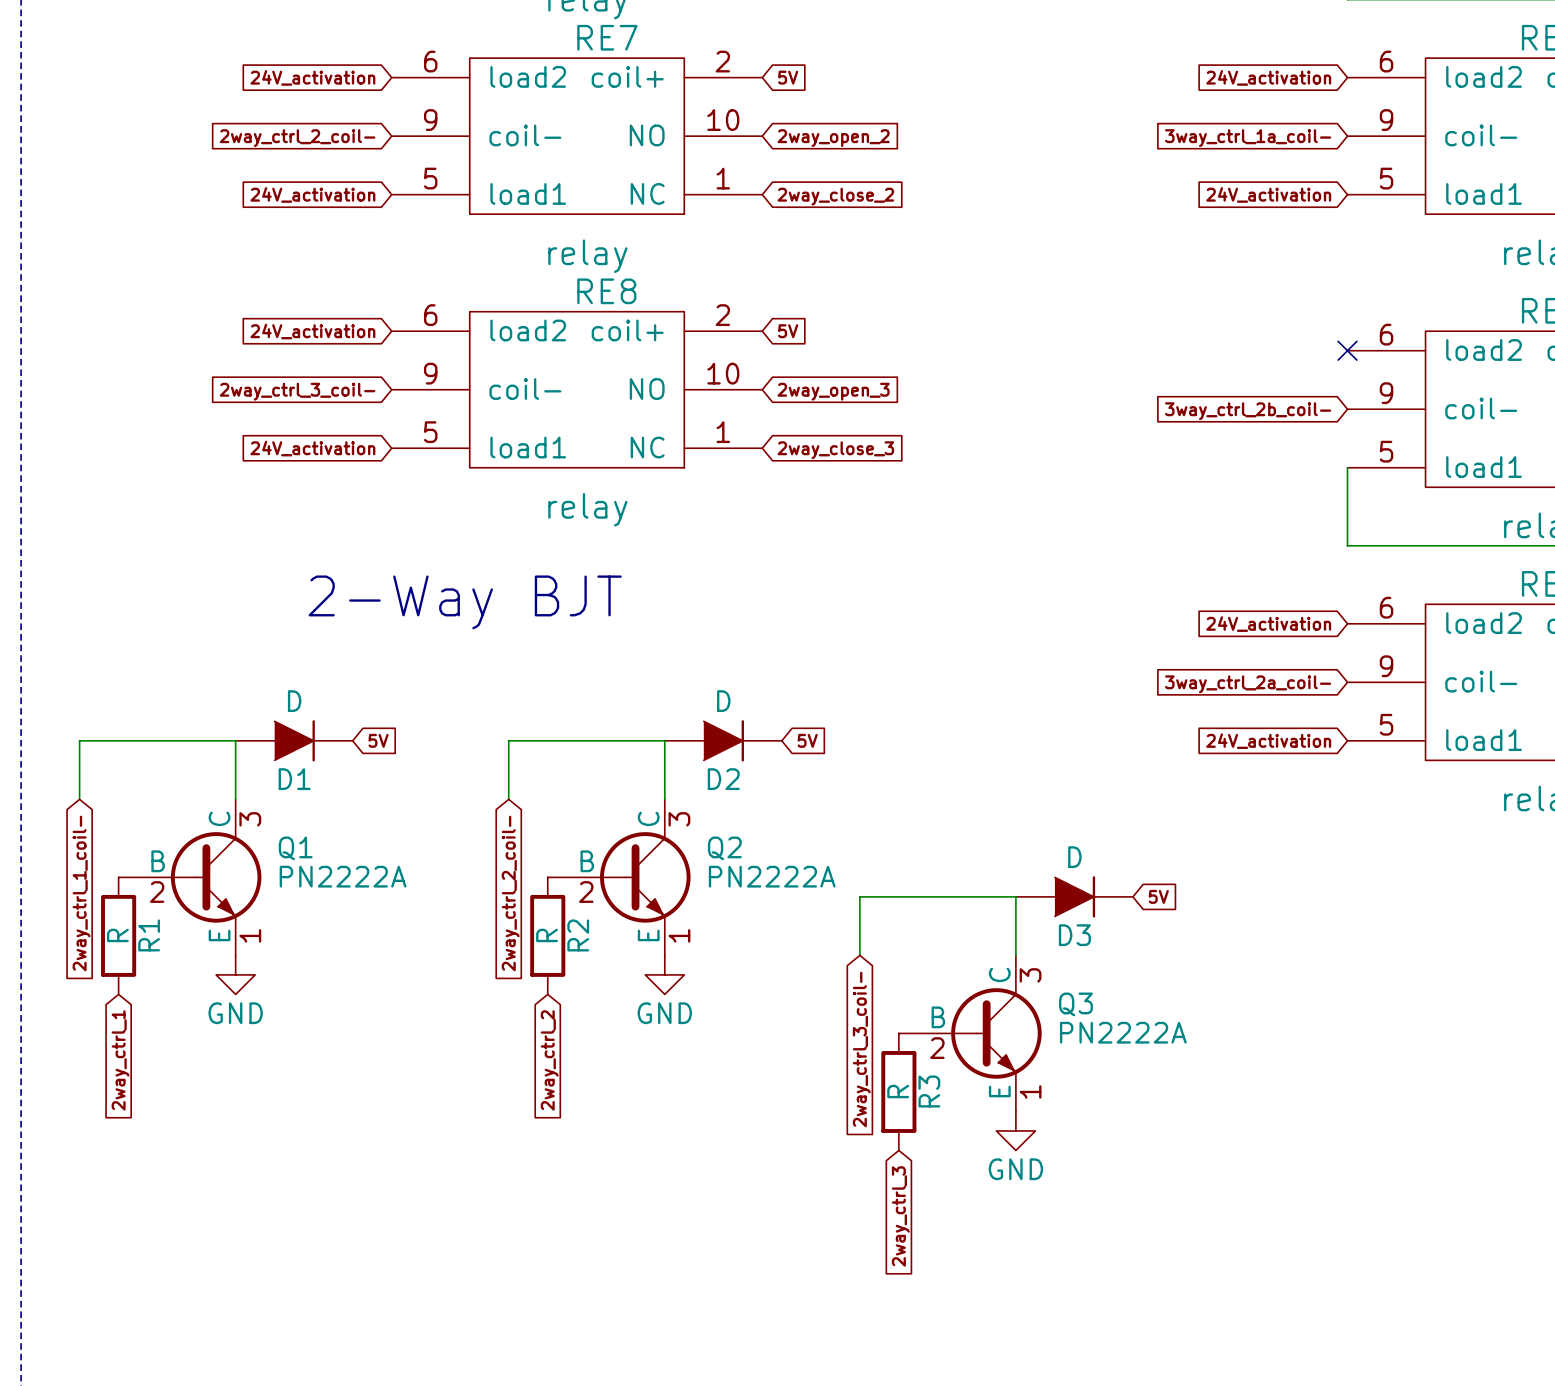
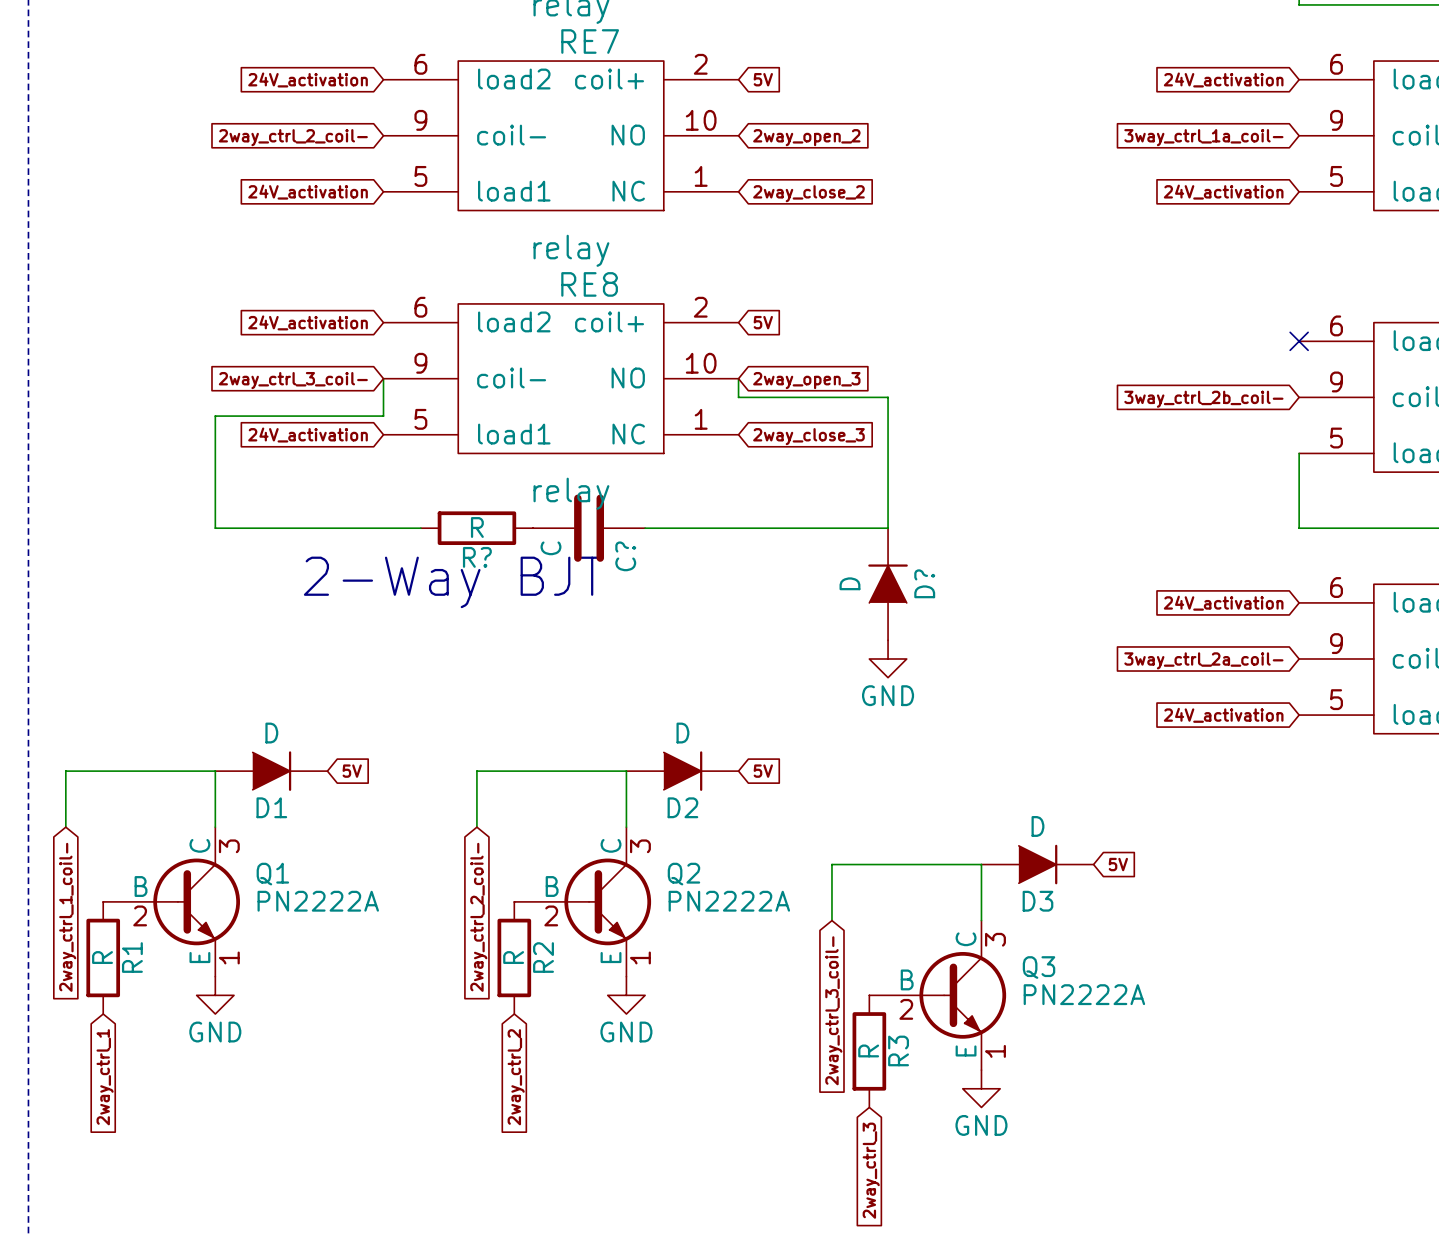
wire: none -> (383, 378) (383, 416) (215, 416) (215, 528) (420, 528)
wire: none -> (738, 378) (738, 397) (888, 397) (888, 528) (645, 528)
R?: none -> R (476, 528)
C?: none -> C (589, 528)
D?: none -> D (888, 584)
power symbol: none -> GND (888, 658)
D1 position: (294, 740) -> (271, 771)
global label position: 5V (378, 740) -> 5V (352, 771)
D2 position: (723, 740) -> (682, 771)
global label position: 5V (807, 740) -> 5V (763, 771)
wire: (79, 799) (79, 740) (235, 740) (235, 799) -> (65, 827) (65, 771) (215, 771) (215, 827)
wire: (508, 799) (508, 740) (664, 740) (664, 799) -> (476, 827) (476, 771) (626, 771) (626, 827)
Q1 position: (190, 877) -> (171, 901)
Q2 position: (619, 877) -> (582, 901)
global label position: 2way_ctrl_1_coil- (81, 893) -> 2way_ctrl_1_coil- (67, 917)
global label position: 2way_ctrl_2_coil- (510, 893) -> 2way_ctrl_2_coil- (478, 917)
R1 position: (118, 935) -> (103, 957)
R2 position: (547, 935) -> (514, 957)
power symbol position: GND (235, 974) -> GND (215, 995)
power symbol position: GND (664, 974) -> GND (626, 995)
global label position: 2way_ctrl_1 (120, 1060) -> 2way_ctrl_1 (105, 1077)
global label position: 2way_ctrl_2 (549, 1060) -> 2way_ctrl_2 (516, 1077)

